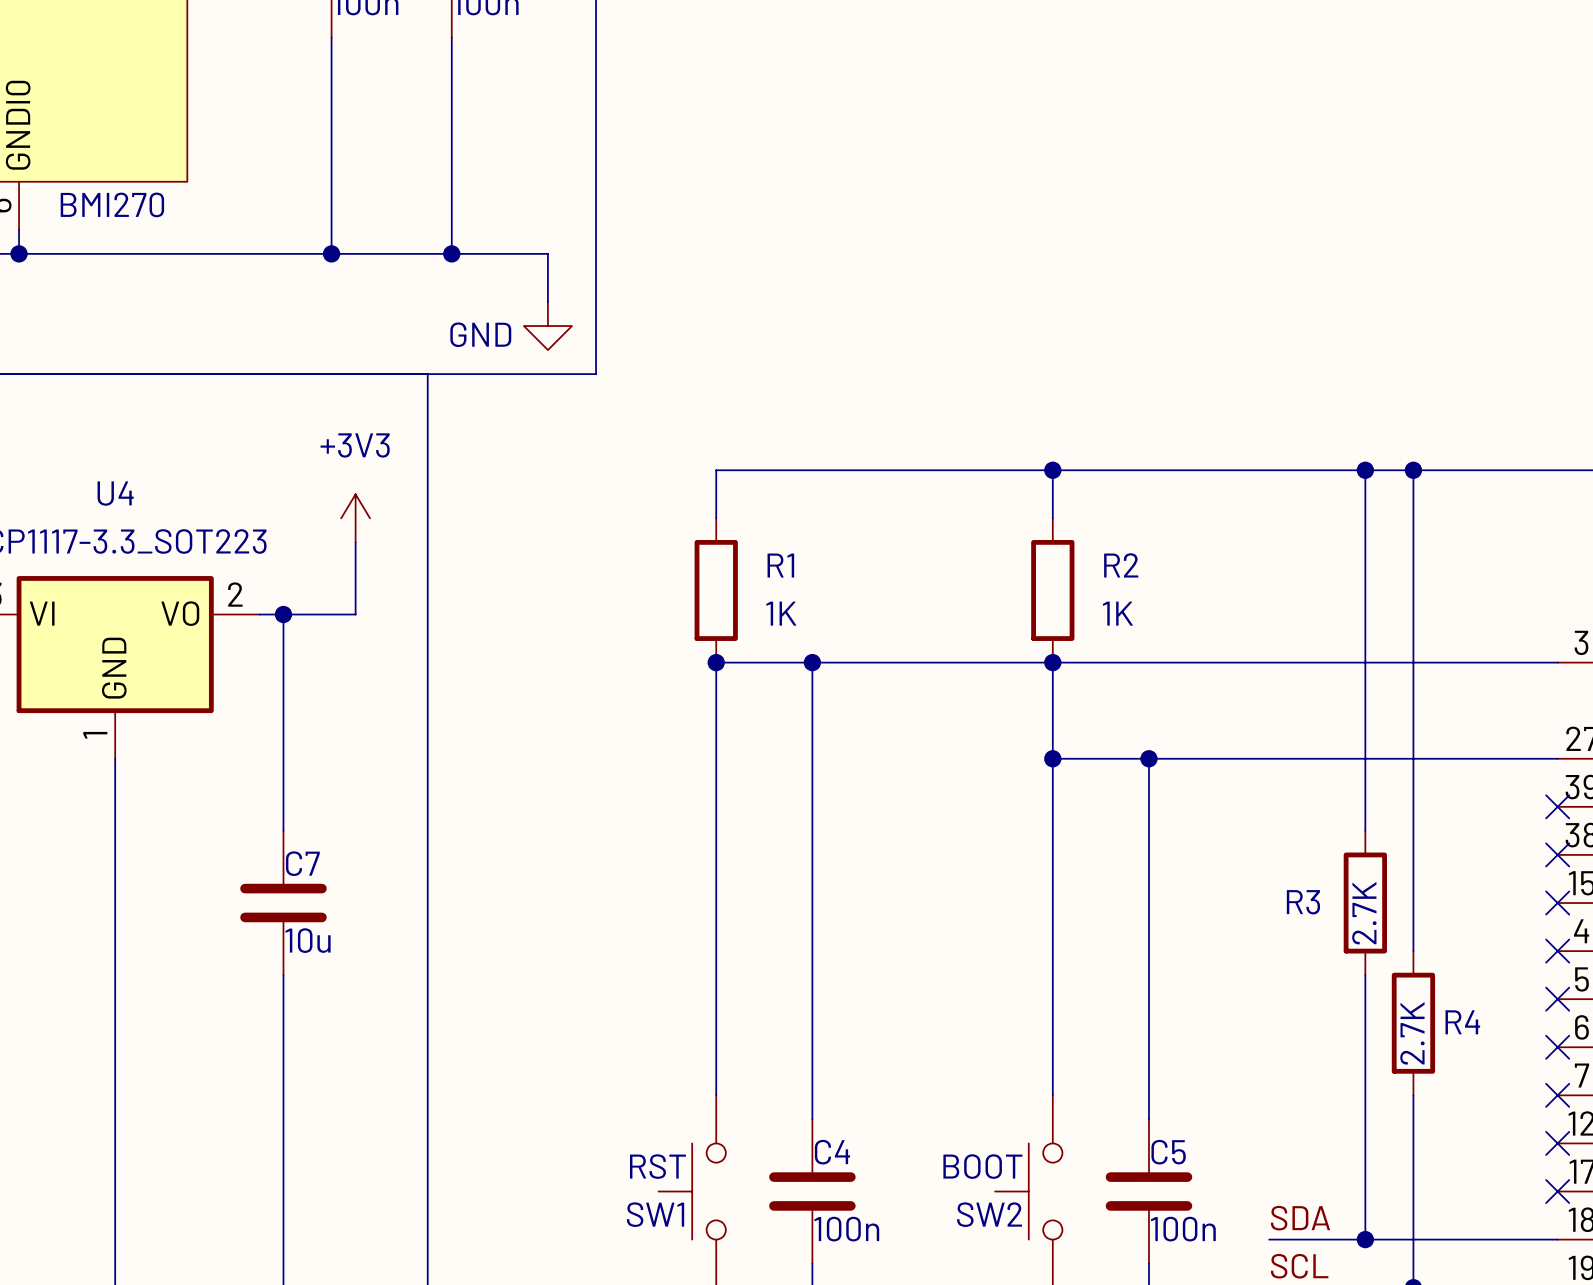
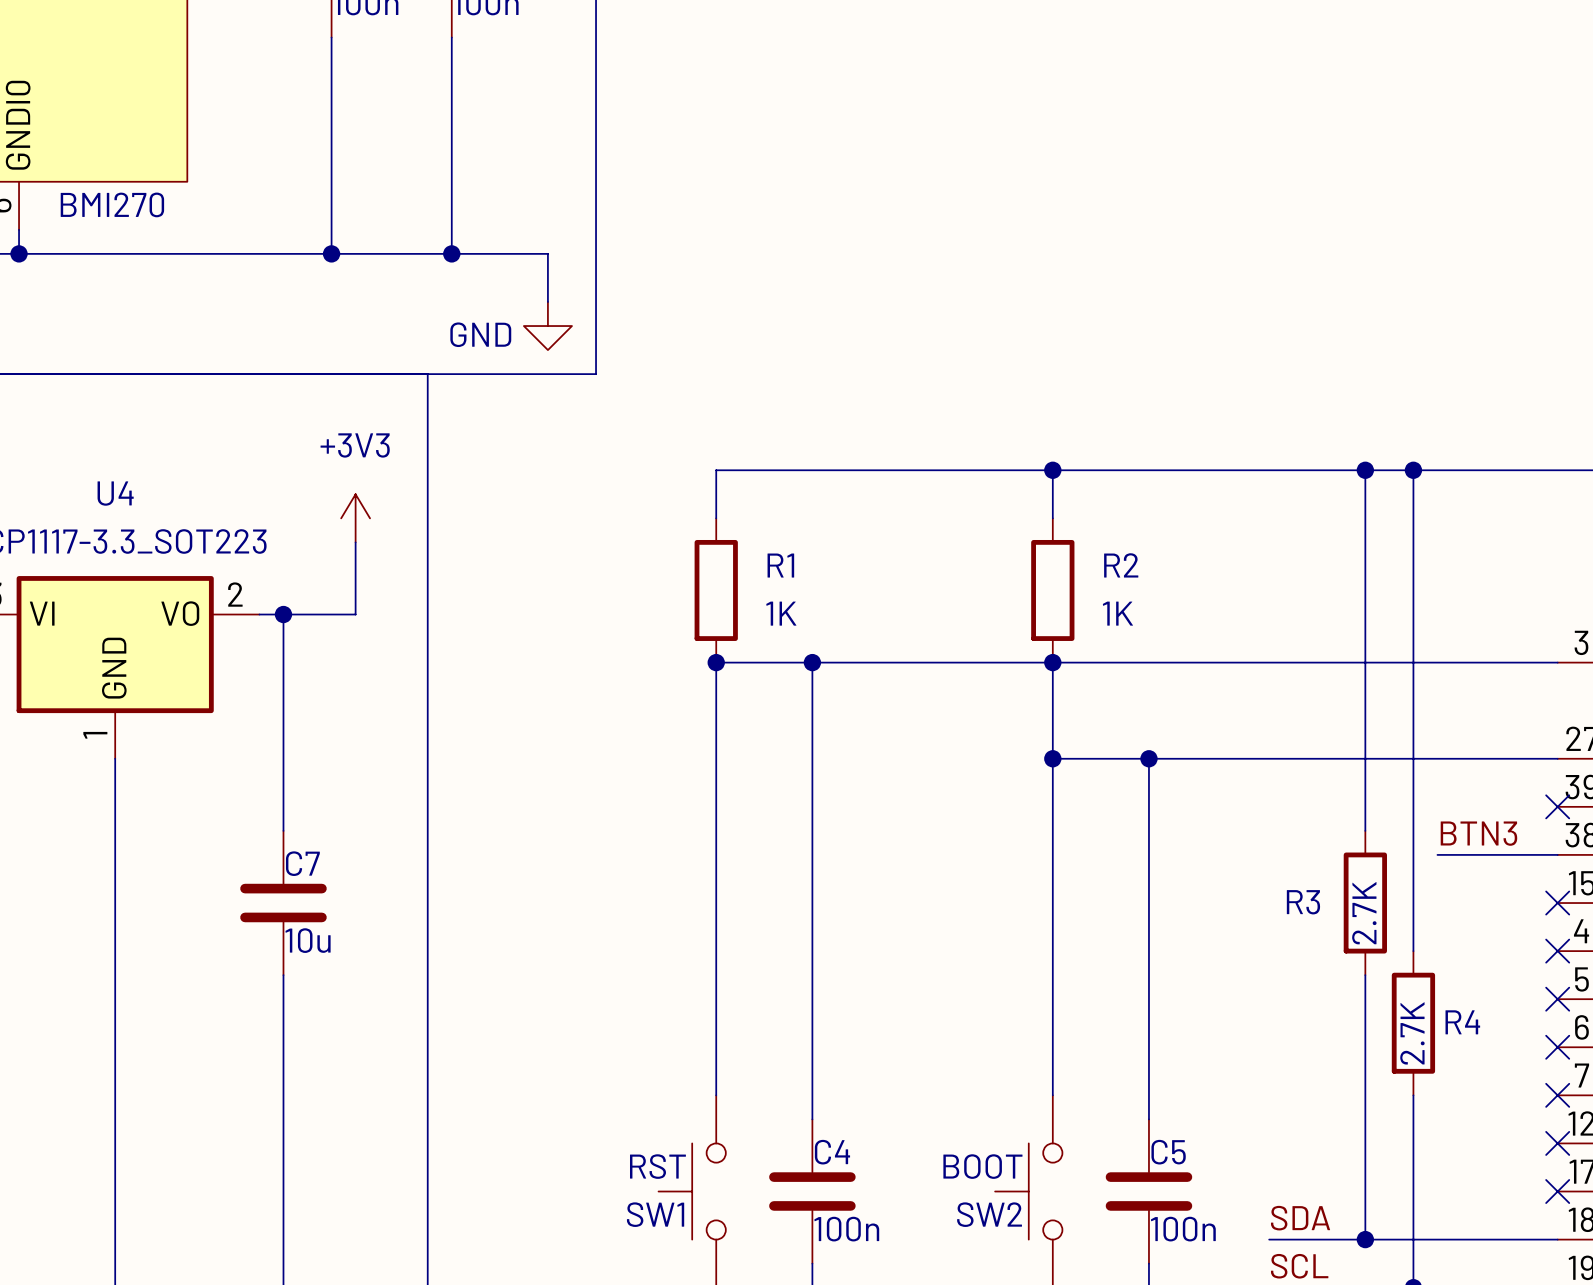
label: none -> BTN3 (1478, 833)
wire: none -> (1437, 854) (1557, 854)
no-connect mark: (1557, 854) -> none

